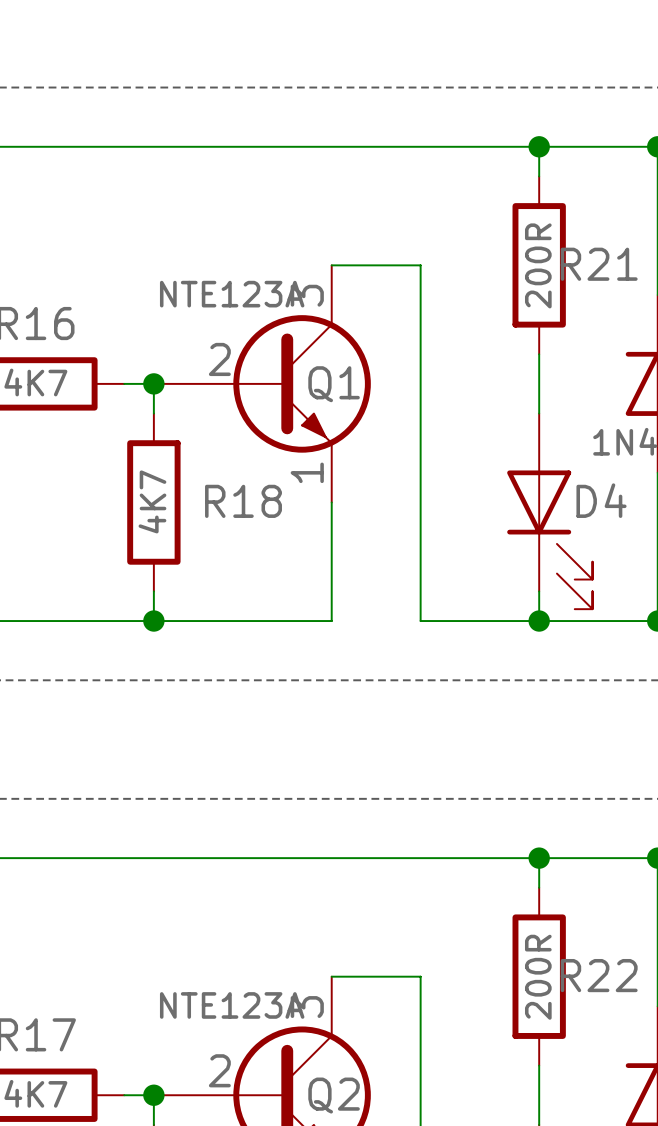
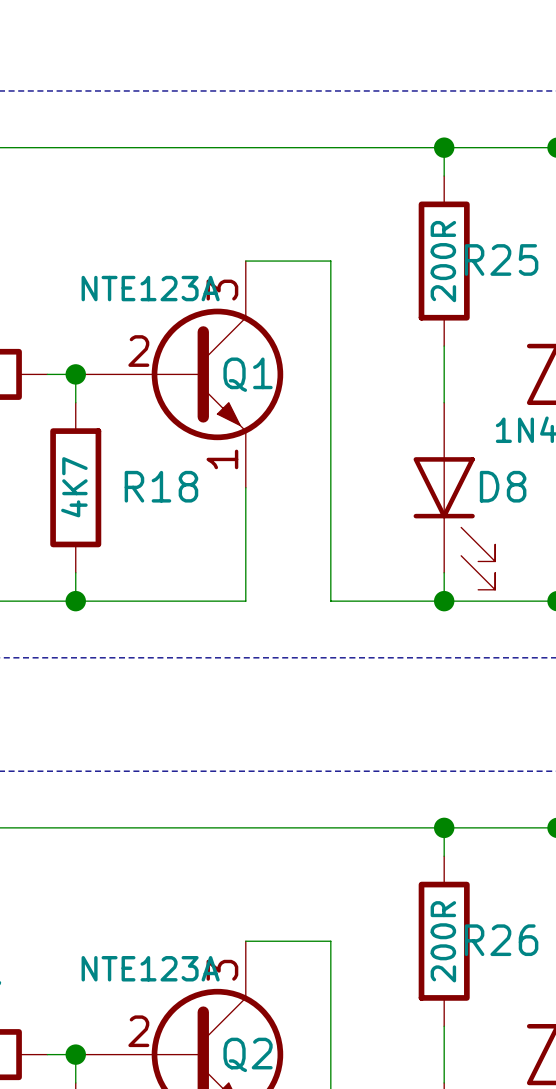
R21 name: R21 (599, 264) -> R25 (501, 259)
D4 name: D4 (601, 500) -> D8 (503, 486)
R22 name: R22 (599, 975) -> R26 (501, 940)

